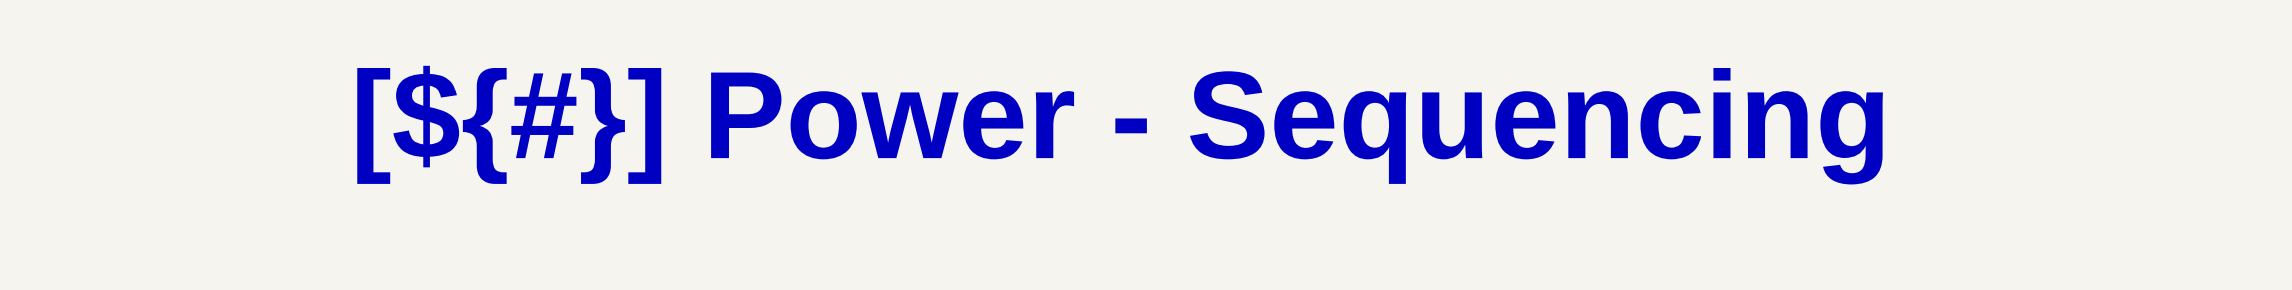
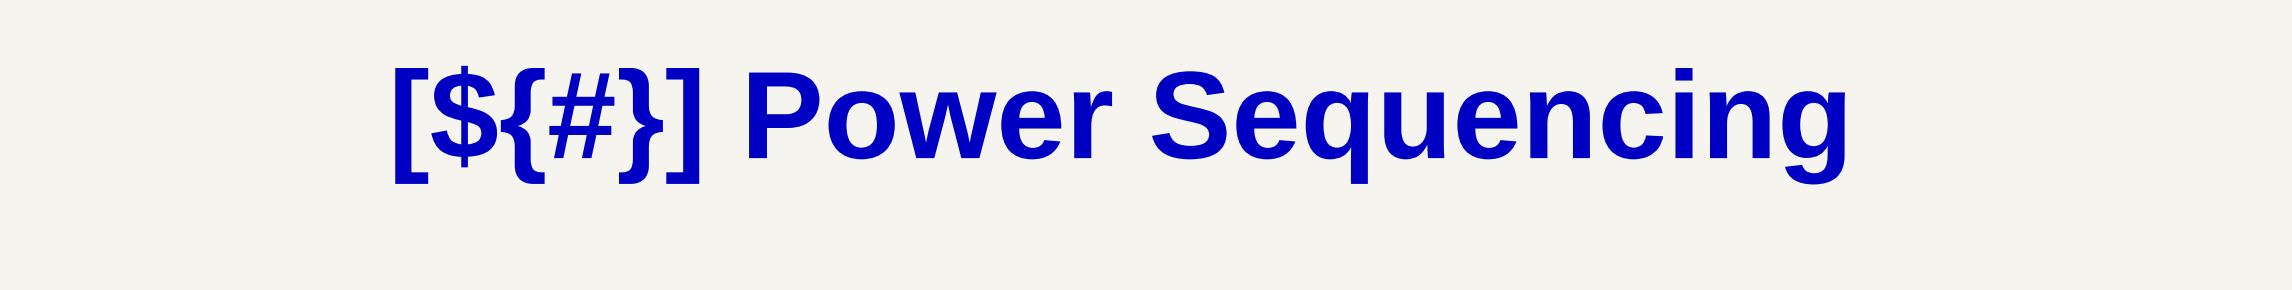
text: [${#}] Power - Sequencing (1120, 125) -> [${#}] Power Sequencing (1120, 125)

